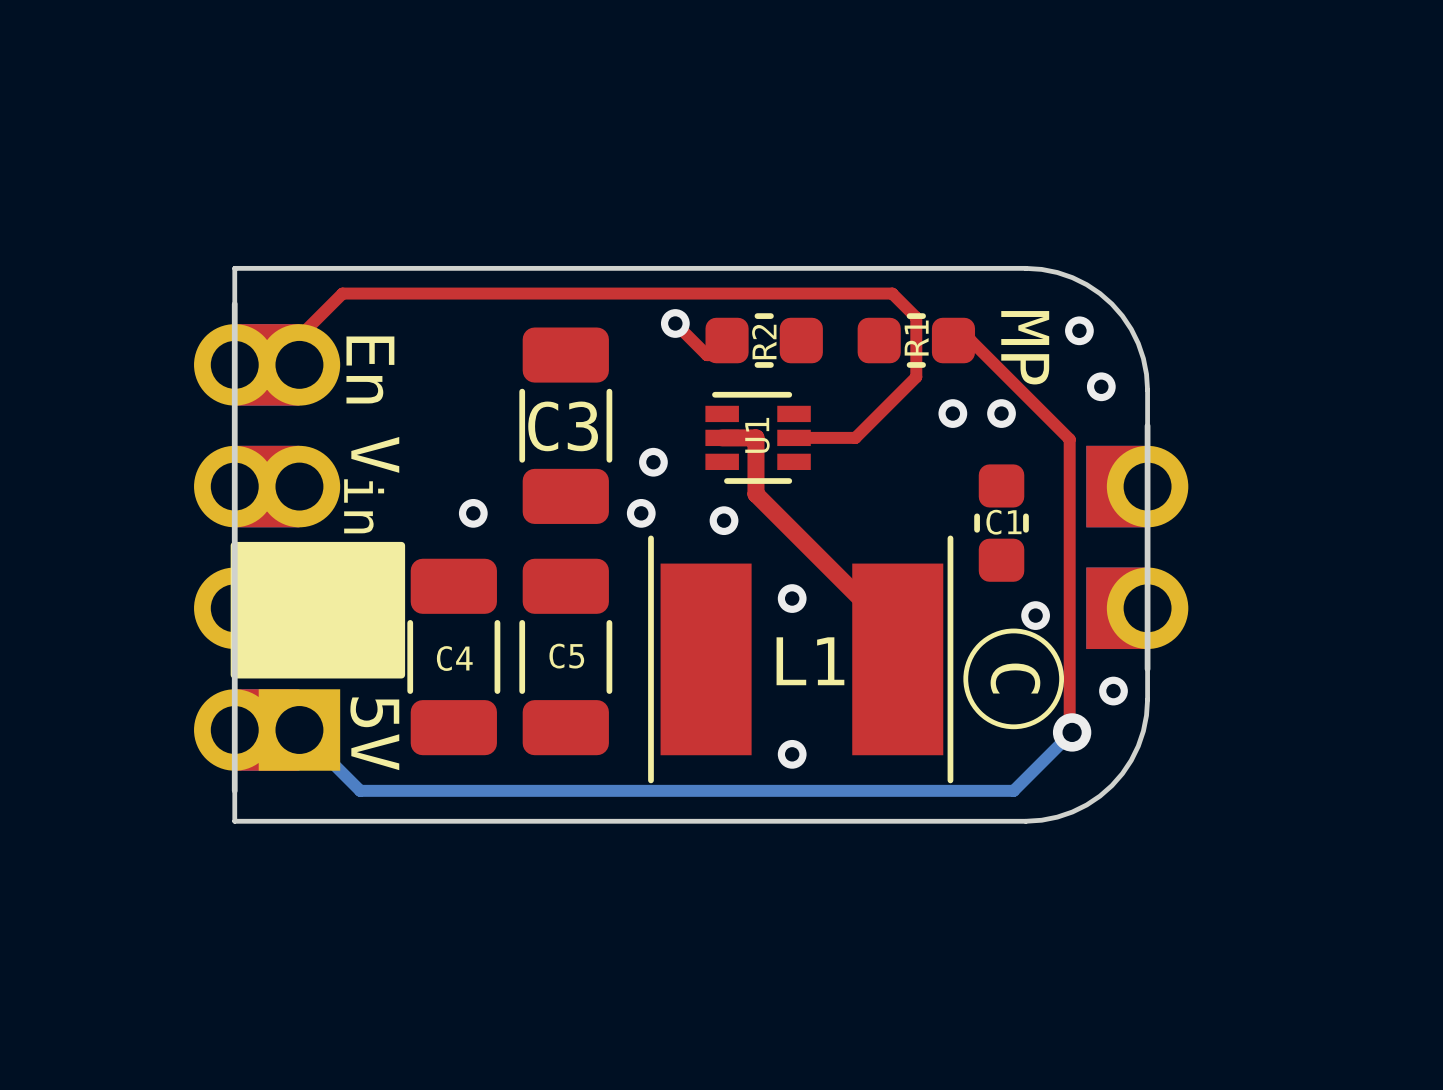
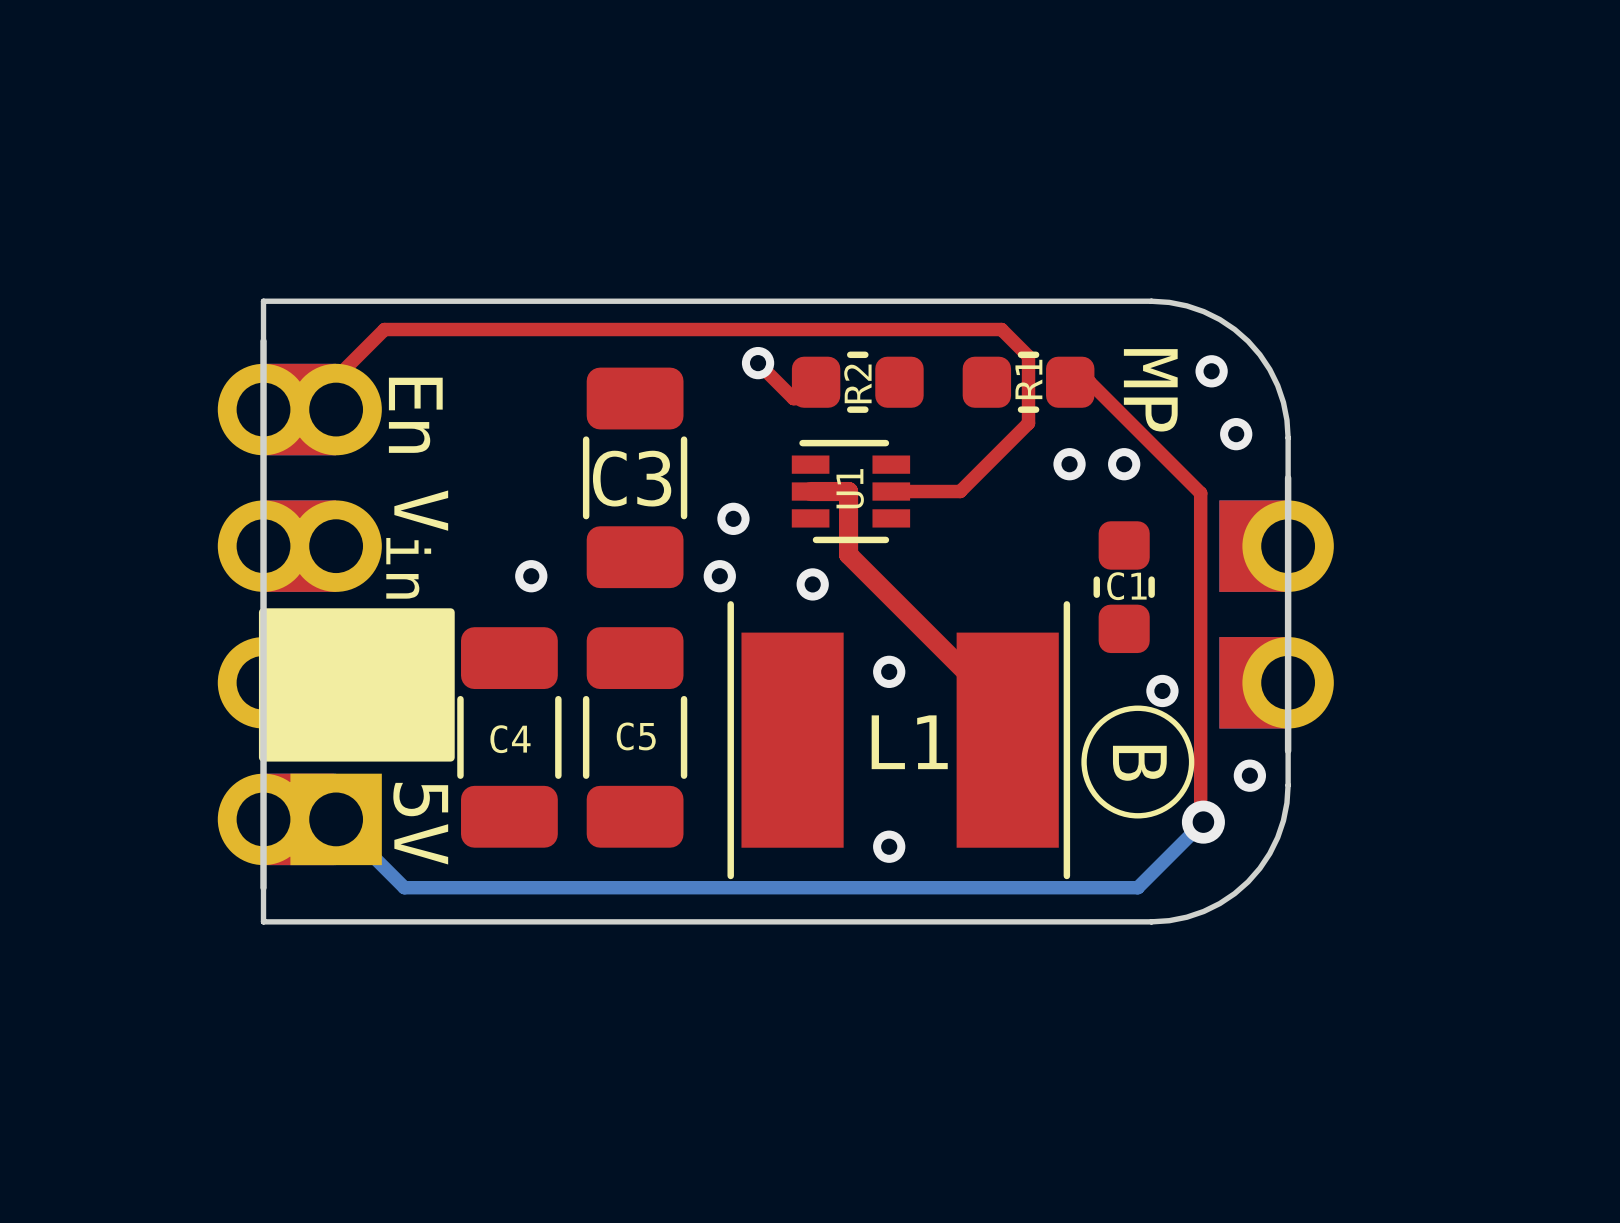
drawing shape: [963, 628, 1065, 730] -> [1081, 705, 1195, 819]

